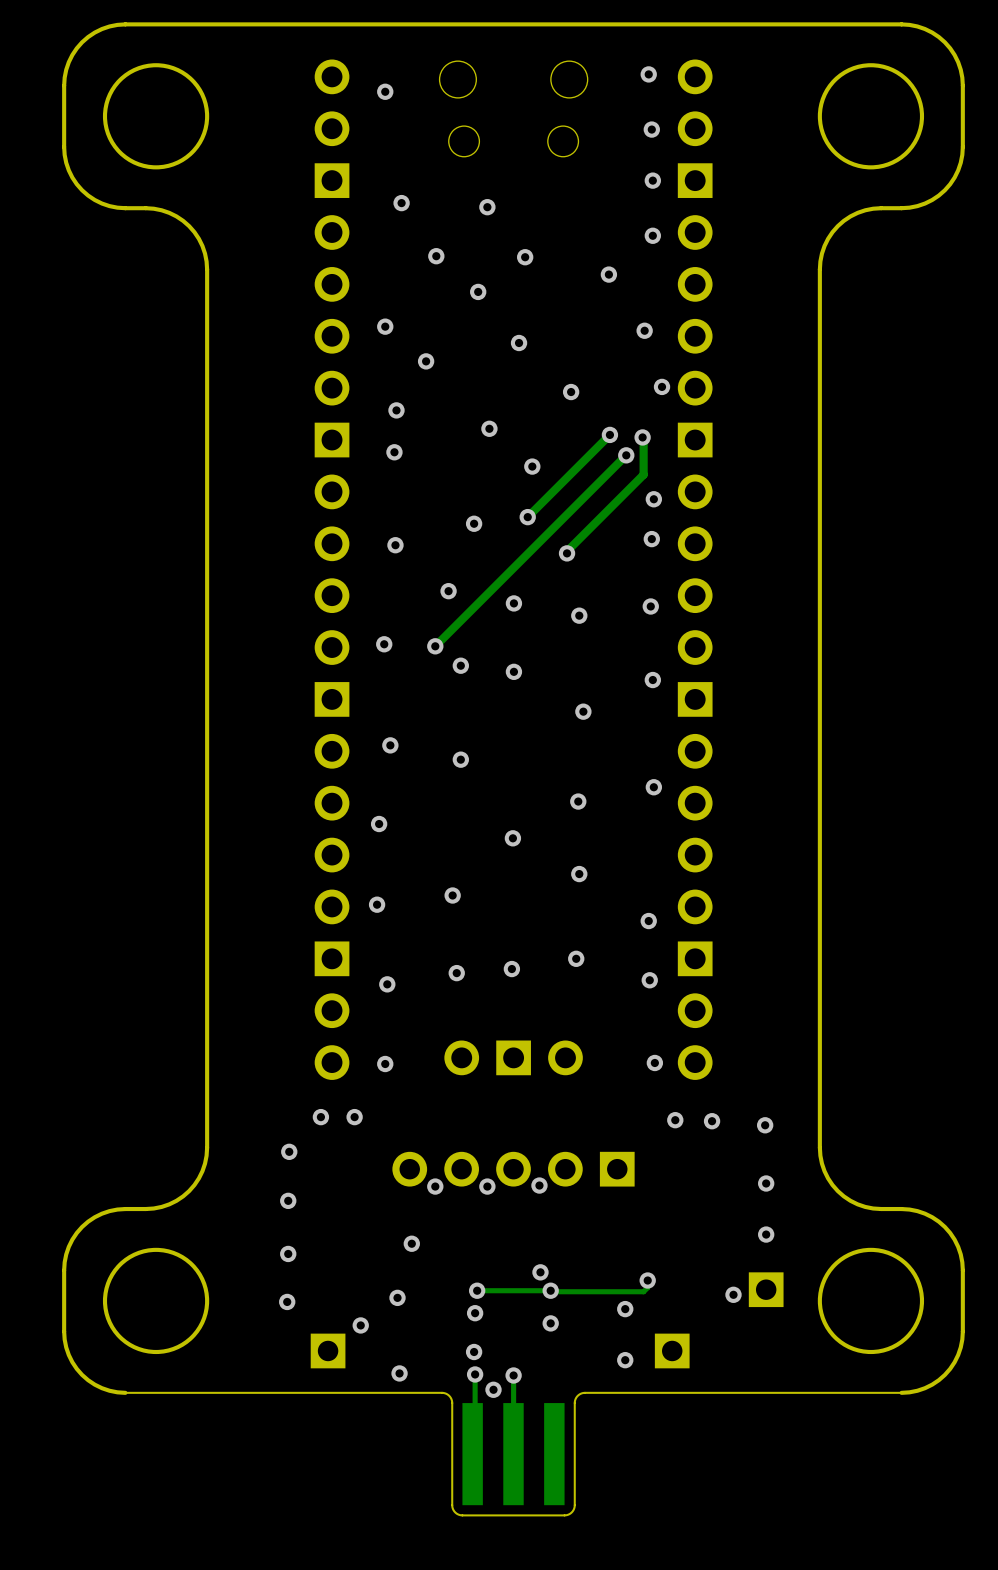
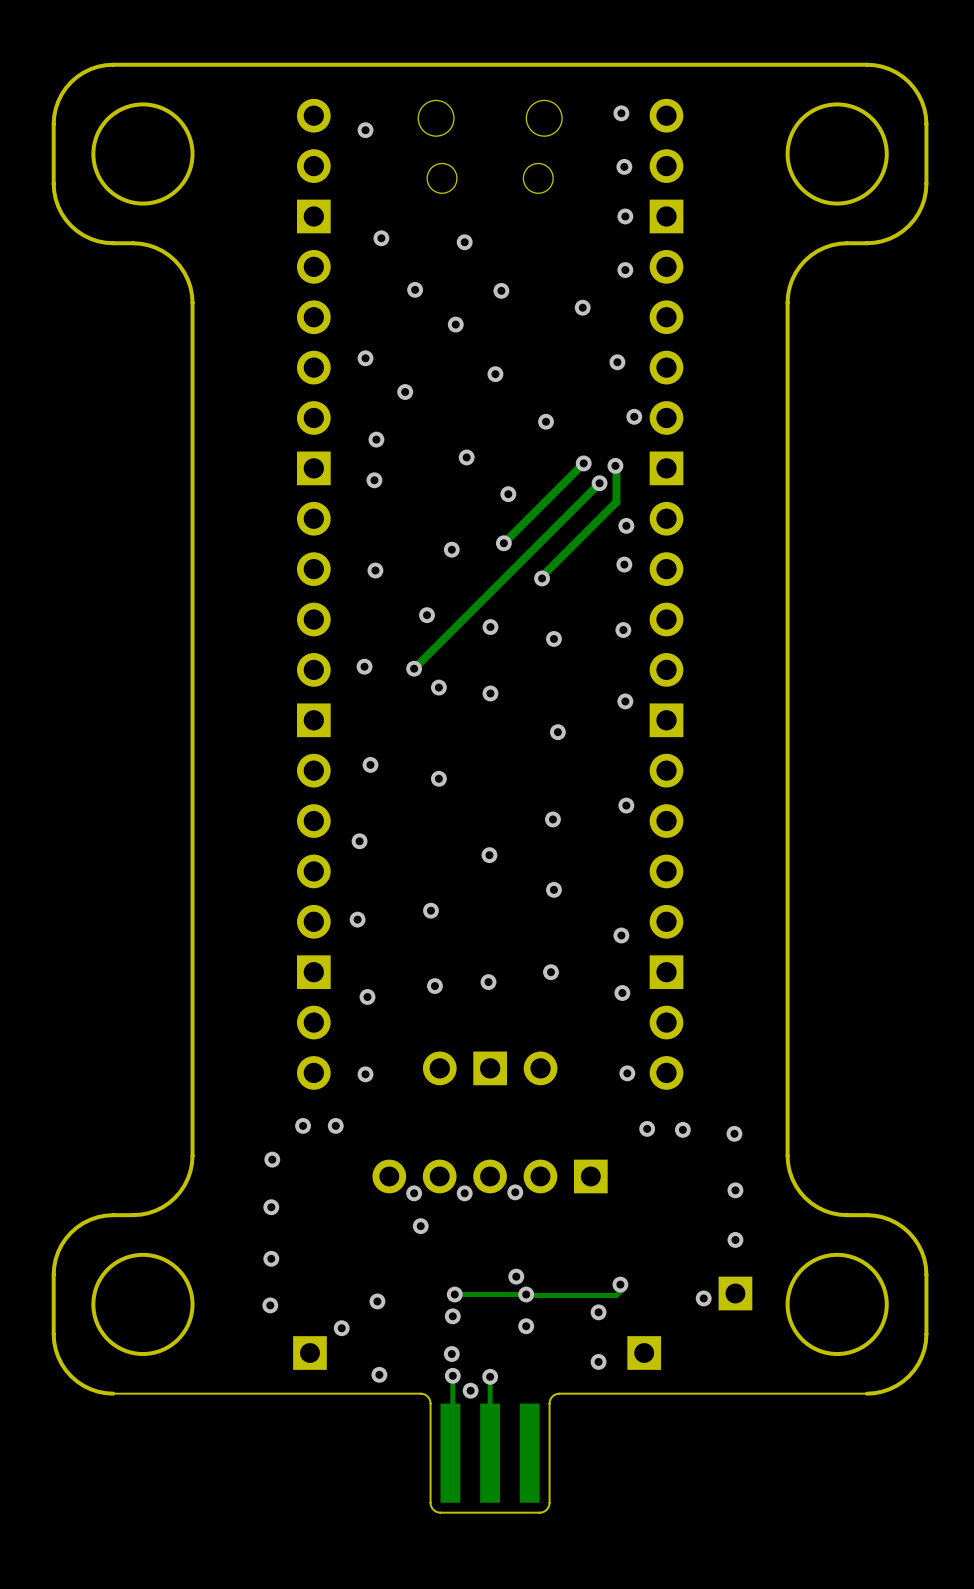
via position: (411, 1243) -> (420, 1226)

